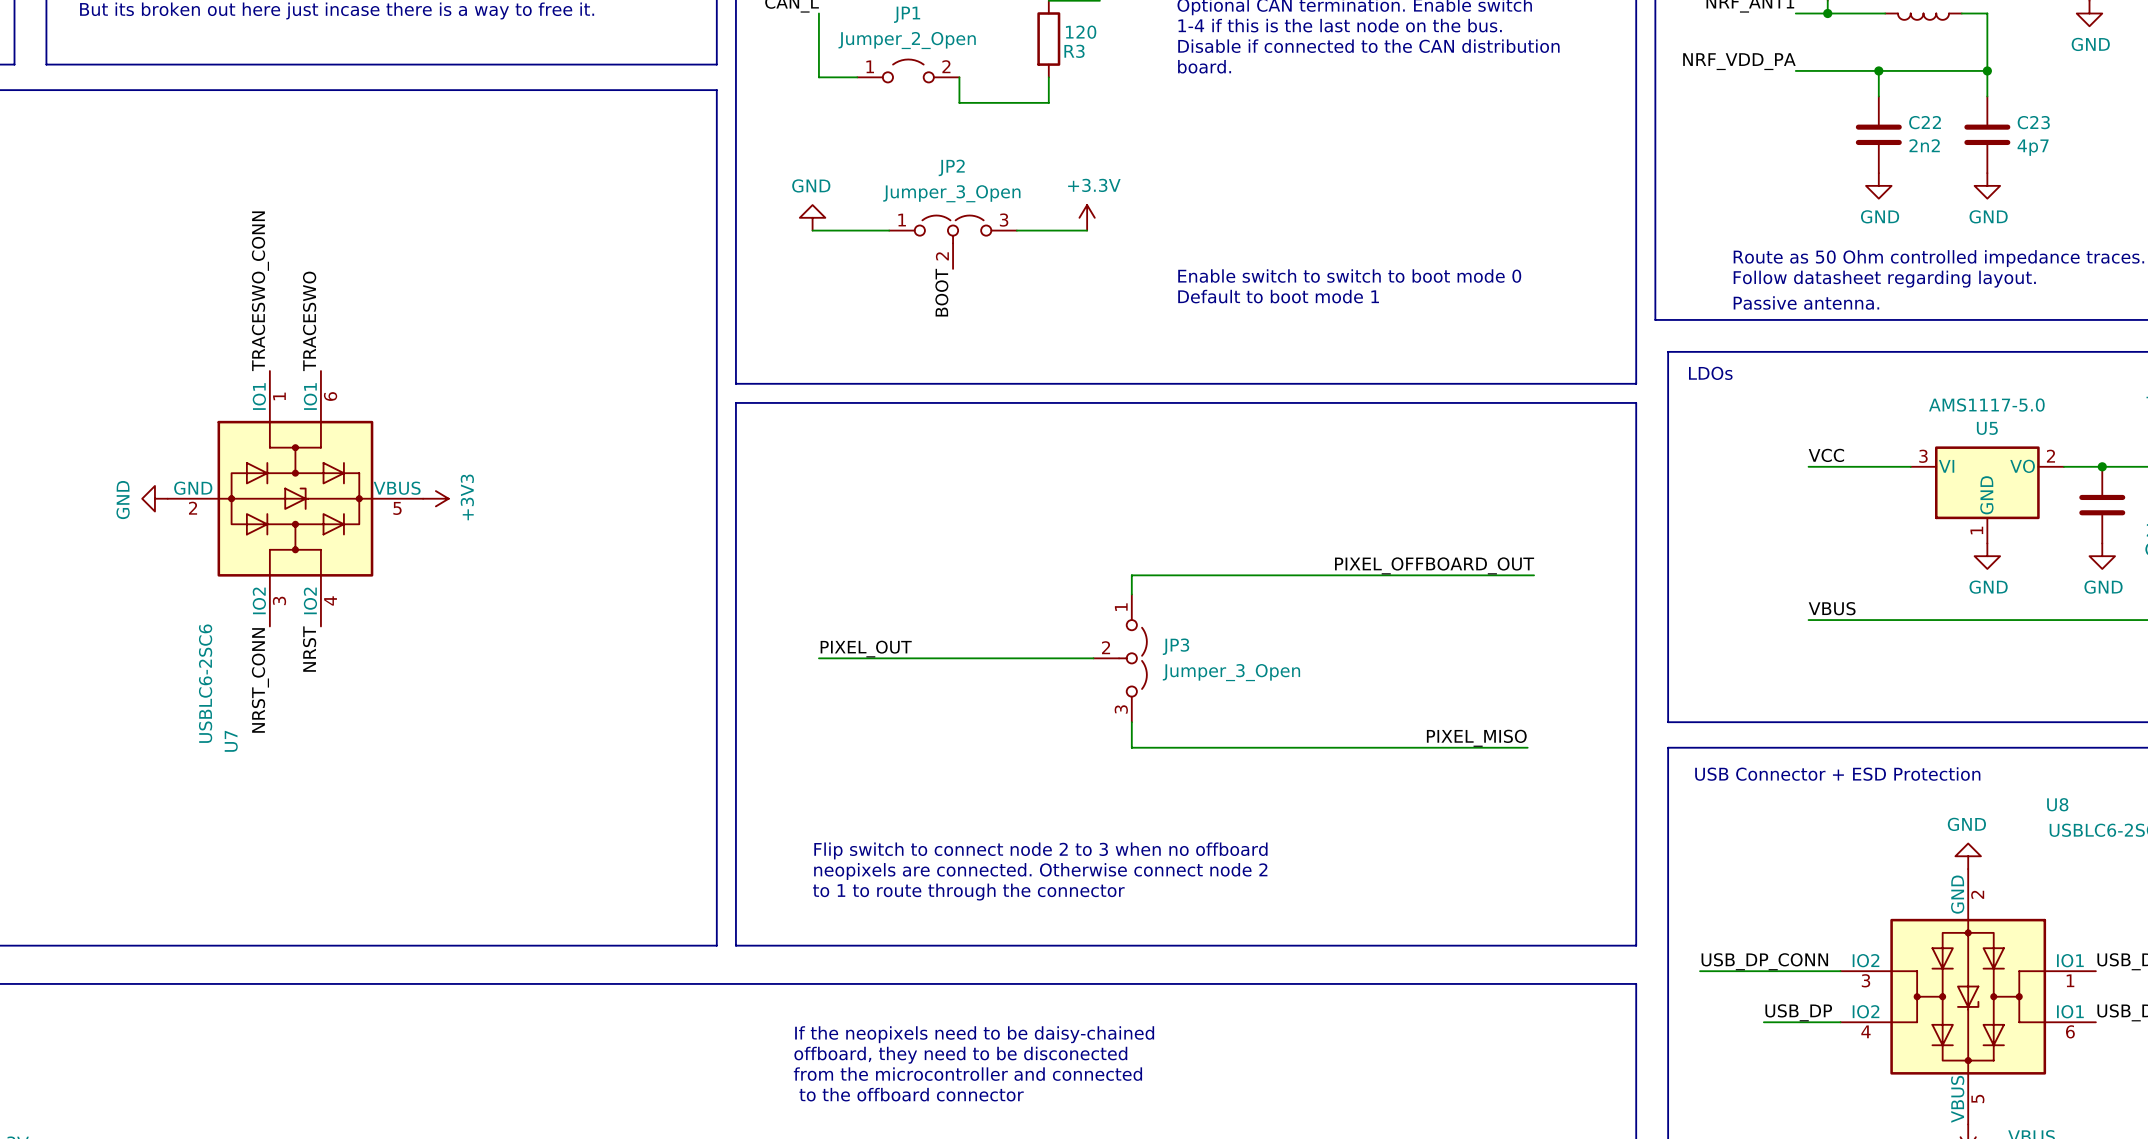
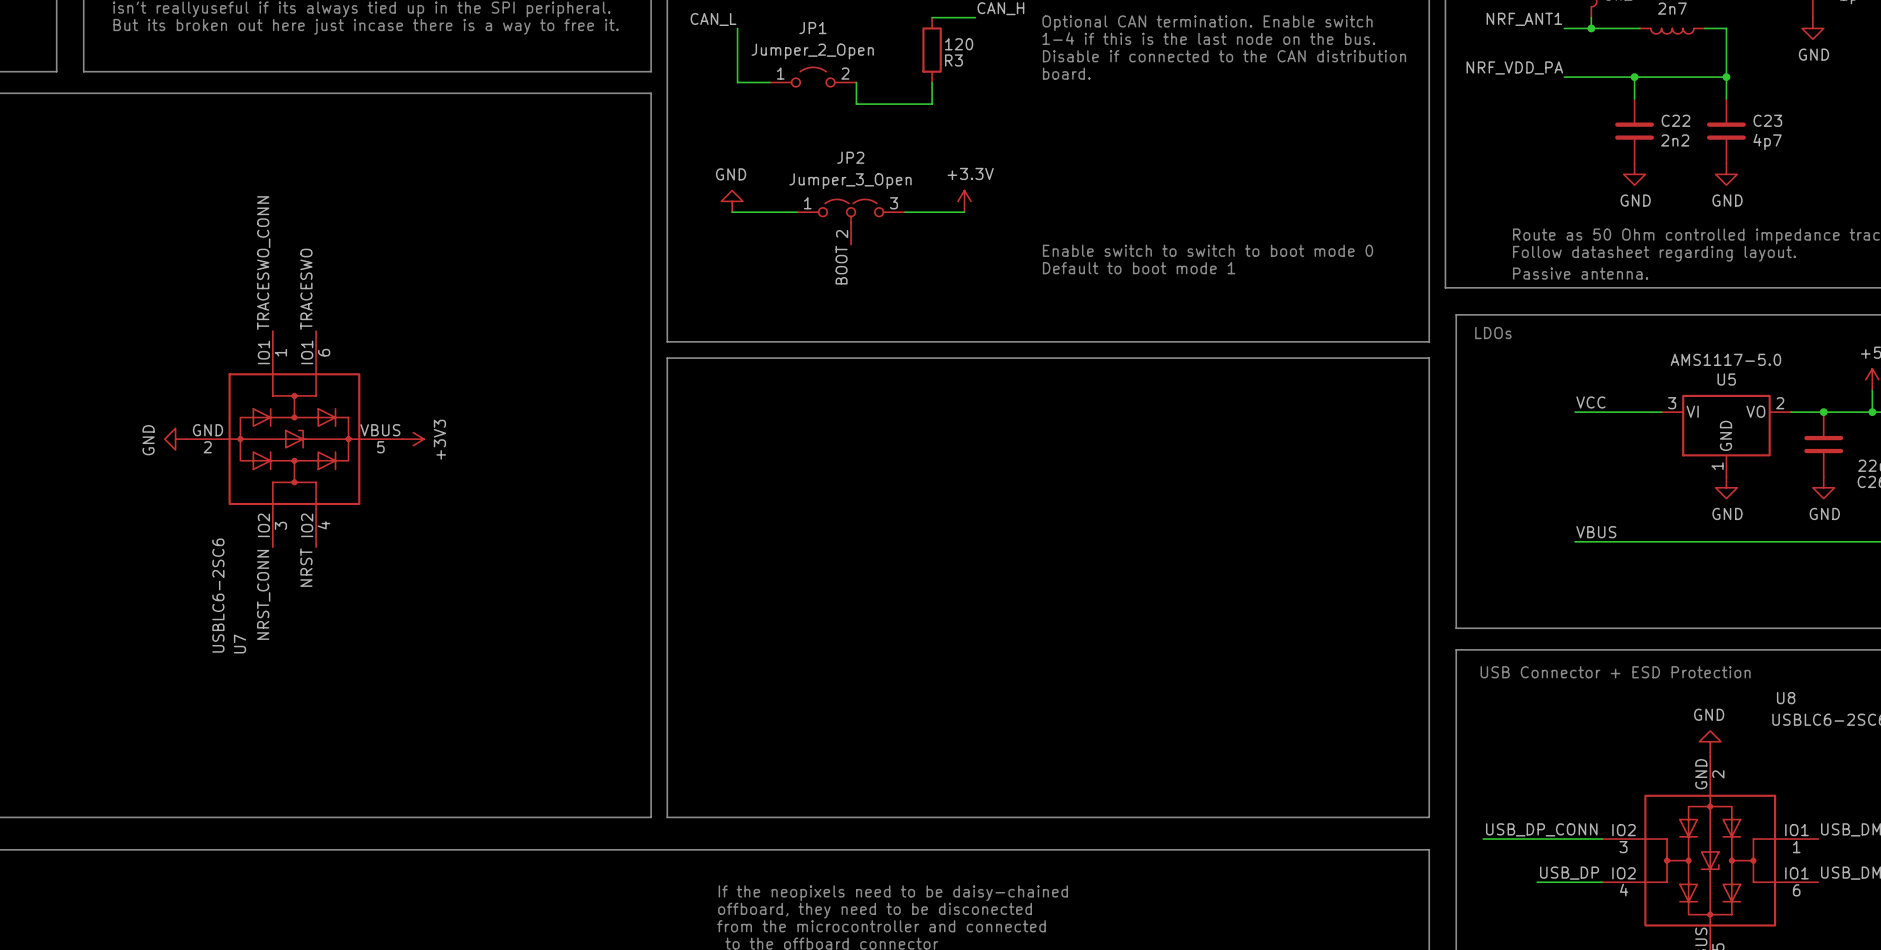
label: PIXEL_OFFBOARD_OUT (1434, 565) -> none
wire: (1534, 575) (1131, 575) (1131, 594) -> none
label: PIXEL_OUT (866, 649) -> none
wire: (818, 658) (1093, 658) -> none
JP3: Jumper_3_Open (1120, 658) -> none
wire: (1131, 722) (1131, 747) (1527, 747) -> none
label: PIXEL_MISO (1476, 738) -> none
text: Flip switch to connect node 2 to 3 when no offboard (1040, 850) -> none
text: neopixels are connected. Otherwise connect node 2 (1040, 871) -> none
text: to 1 to route through the connector (968, 892) -> none

